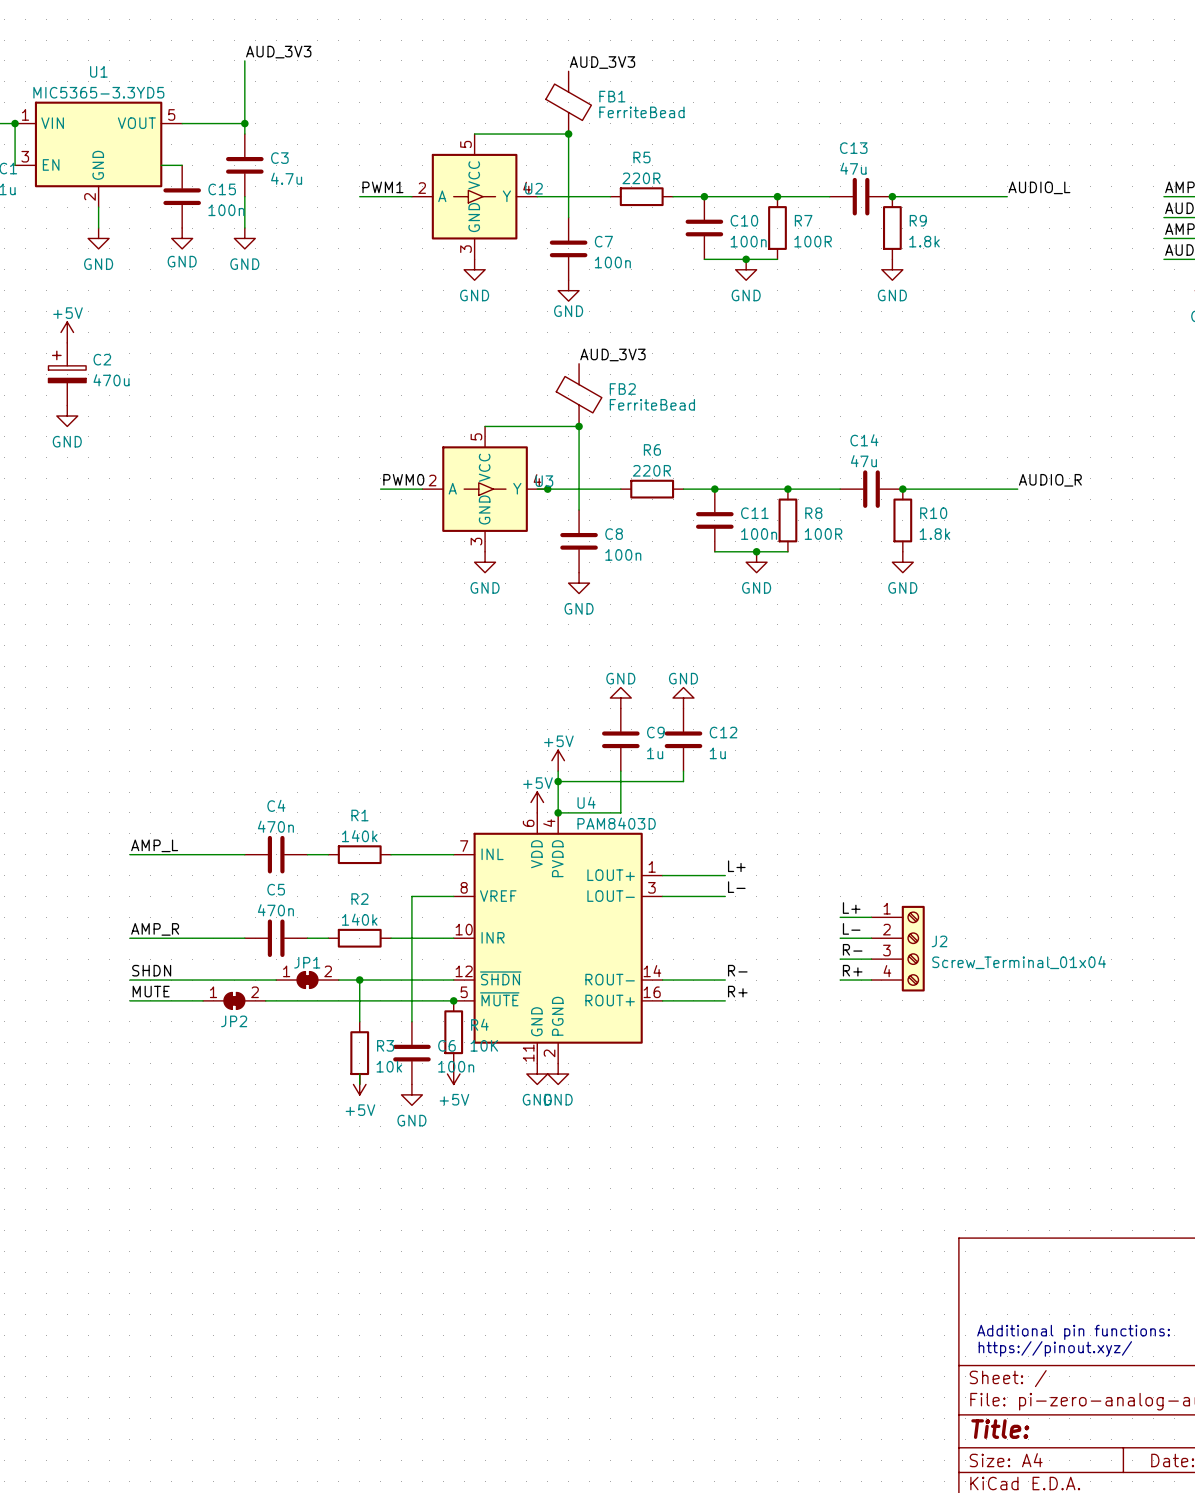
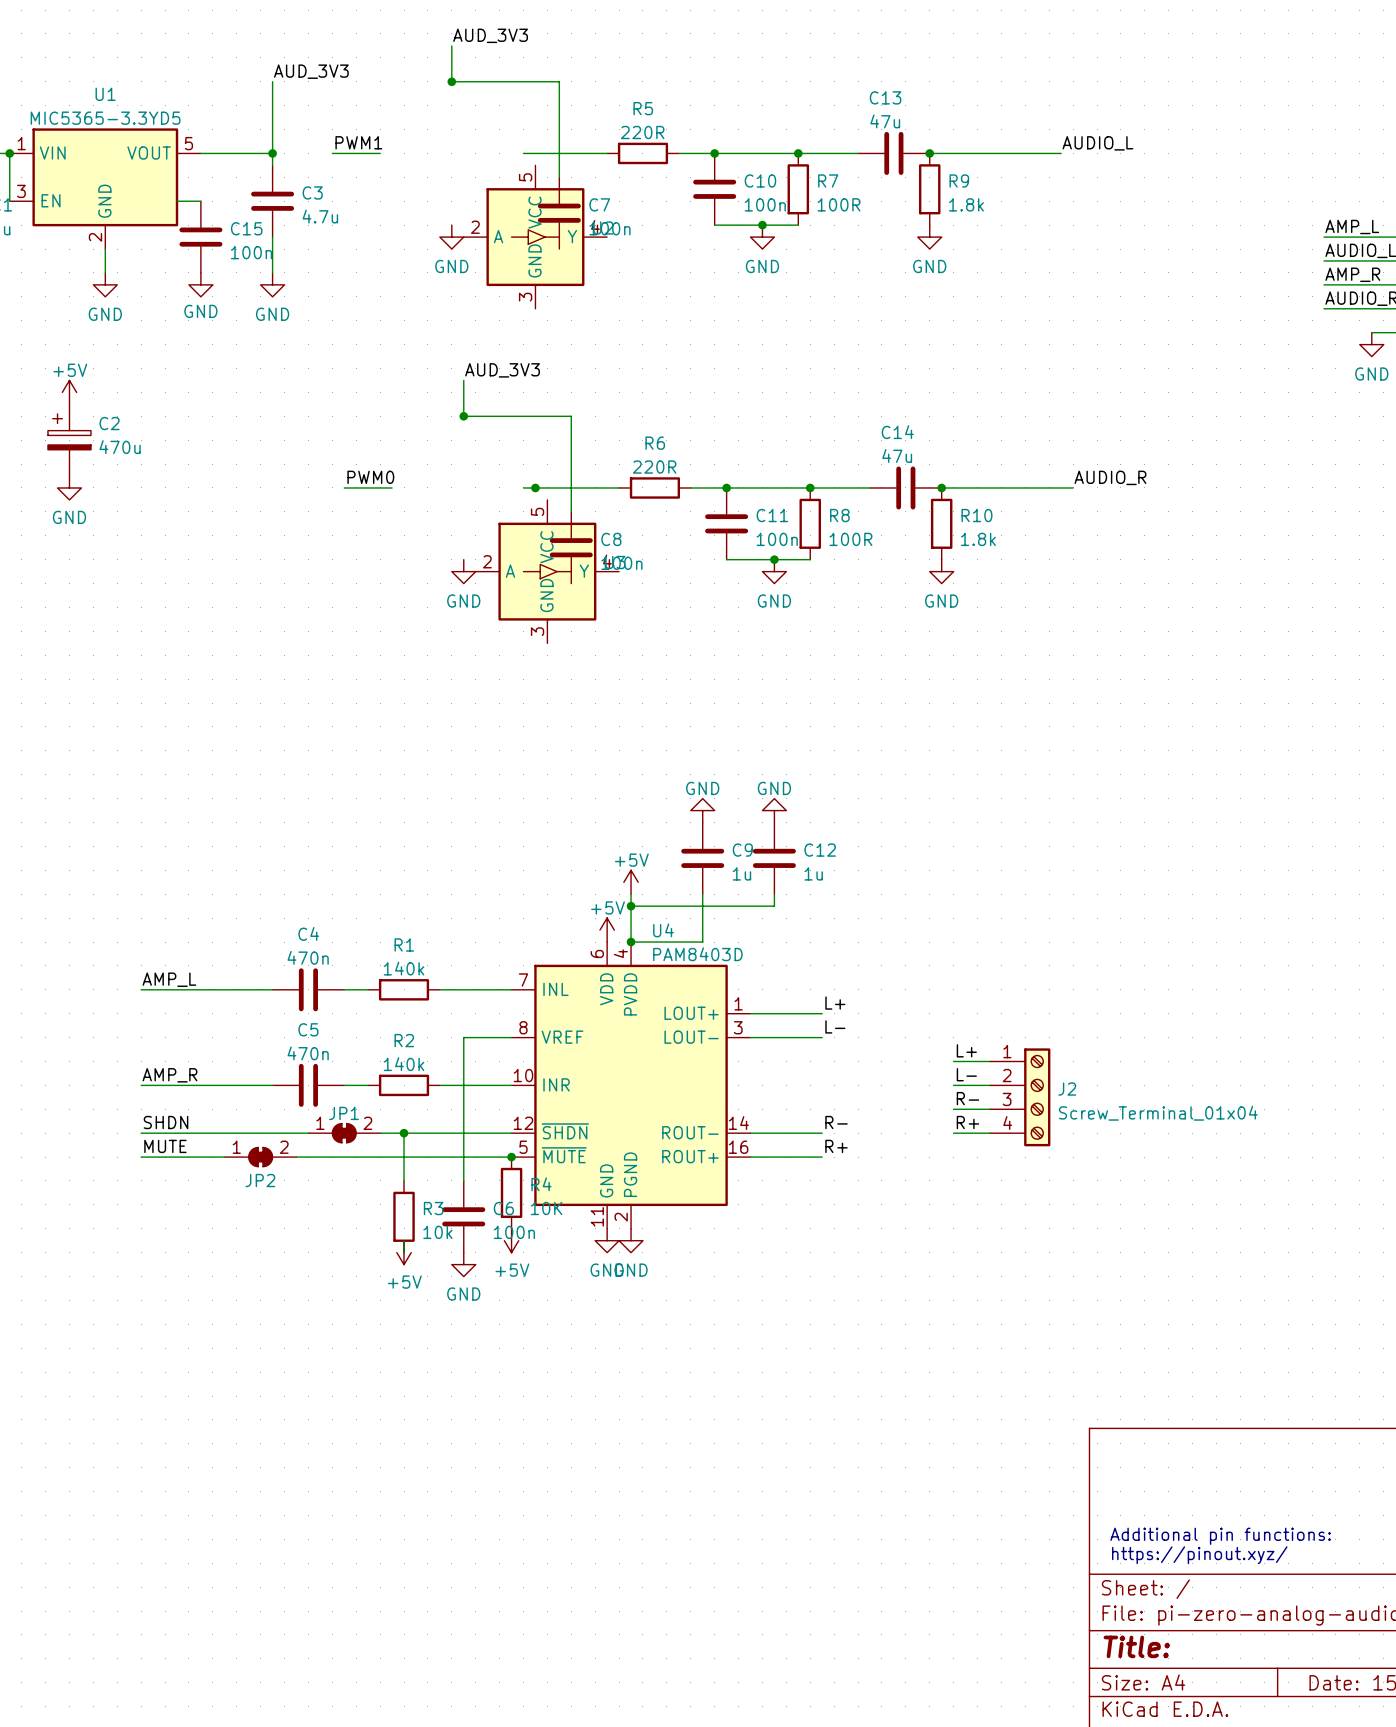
label: none -> AUD_3V3 (490, 35)
wire: none -> (451, 45) (451, 81) (559, 81) (559, 177)
junction: none -> (451, 81)
label: AUD_3V3 (602, 62) -> none
FB1: FerriteBead (568, 102) -> none
wire: none -> (332, 153) (380, 153)
junction: none -> (714, 153)
junction: none -> (798, 153)
junction: none -> (929, 153)
wire: (474, 134) (568, 134) (568, 217) -> none
junction: (568, 134) -> none
label position: PWM1 (382, 187) -> PWM1 (358, 142)
label position: AUDIO_L (1039, 187) -> AUDIO_L (1097, 143)
wire: (359, 196) (411, 196) -> none
power symbol: none -> GND (451, 237)
wire: (537, 196) (610, 196) -> (523, 153) (607, 153)
R5 position: (641, 196) -> (642, 153)
wire: (673, 196) (829, 196) -> (678, 153) (858, 153)
power symbol: none -> GND (762, 237)
junction position: (704, 196) -> (762, 225)
junction: (777, 196) -> none
power symbol: none -> GND (929, 237)
C13 position: (861, 196) -> (893, 153)
wire: (892, 196) (1007, 196) -> (929, 153) (1061, 153)
junction: (892, 196) -> none
C10 position: (704, 228) -> (714, 189)
R7 position: (777, 228) -> (798, 189)
R9 position: (892, 228) -> (929, 189)
C7 position: (568, 248) -> (559, 213)
wire: (704, 259) (777, 259) -> (714, 225) (798, 225)
junction: (746, 259) -> none
power symbol: GND (474, 269) -> none
power symbol: GND (746, 269) -> none
power symbol: GND (892, 269) -> none
power symbol: GND (568, 290) -> none
label: none -> AUD_3V3 (502, 370)
wire: none -> (463, 380) (463, 416) (571, 416) (571, 511)
junction: none -> (463, 416)
label: AUD_3V3 (612, 354) -> none
FB2: FerriteBead (579, 395) -> none
junction: none -> (535, 487)
junction: none -> (726, 487)
junction: none -> (810, 487)
junction: none -> (941, 487)
wire: (485, 426) (579, 426) (579, 510) -> none
junction: (579, 426) -> none
label position: PWM0 (403, 479) -> PWM0 (370, 477)
label position: AUDIO_R (1050, 480) -> AUDIO_R (1110, 477)
wire: (380, 489) (422, 489) -> (344, 487) (392, 487)
power symbol: none -> GND (463, 571)
wire: (537, 489) (620, 489) -> (523, 487) (619, 487)
junction: (547, 489) -> none
R6 position: (652, 489) -> (654, 487)
wire: (683, 489) (840, 489) -> (690, 487) (869, 487)
power symbol: none -> GND (774, 571)
junction position: (714, 489) -> (774, 559)
junction: (787, 489) -> none
power symbol: none -> GND (941, 571)
C14 position: (871, 489) -> (905, 487)
wire: (902, 489) (1017, 489) -> (941, 487) (1073, 487)
junction: (902, 489) -> none
C11 position: (714, 520) -> (726, 523)
R8 position: (787, 520) -> (810, 523)
R10 position: (902, 520) -> (941, 523)
C8 position: (579, 541) -> (571, 547)
wire: (714, 551) (787, 551) -> (726, 559) (810, 559)
junction: (756, 551) -> none
power symbol: GND (485, 562) -> none
power symbol: GND (756, 562) -> none
power symbol: GND (902, 562) -> none
power symbol: GND (579, 583) -> none

